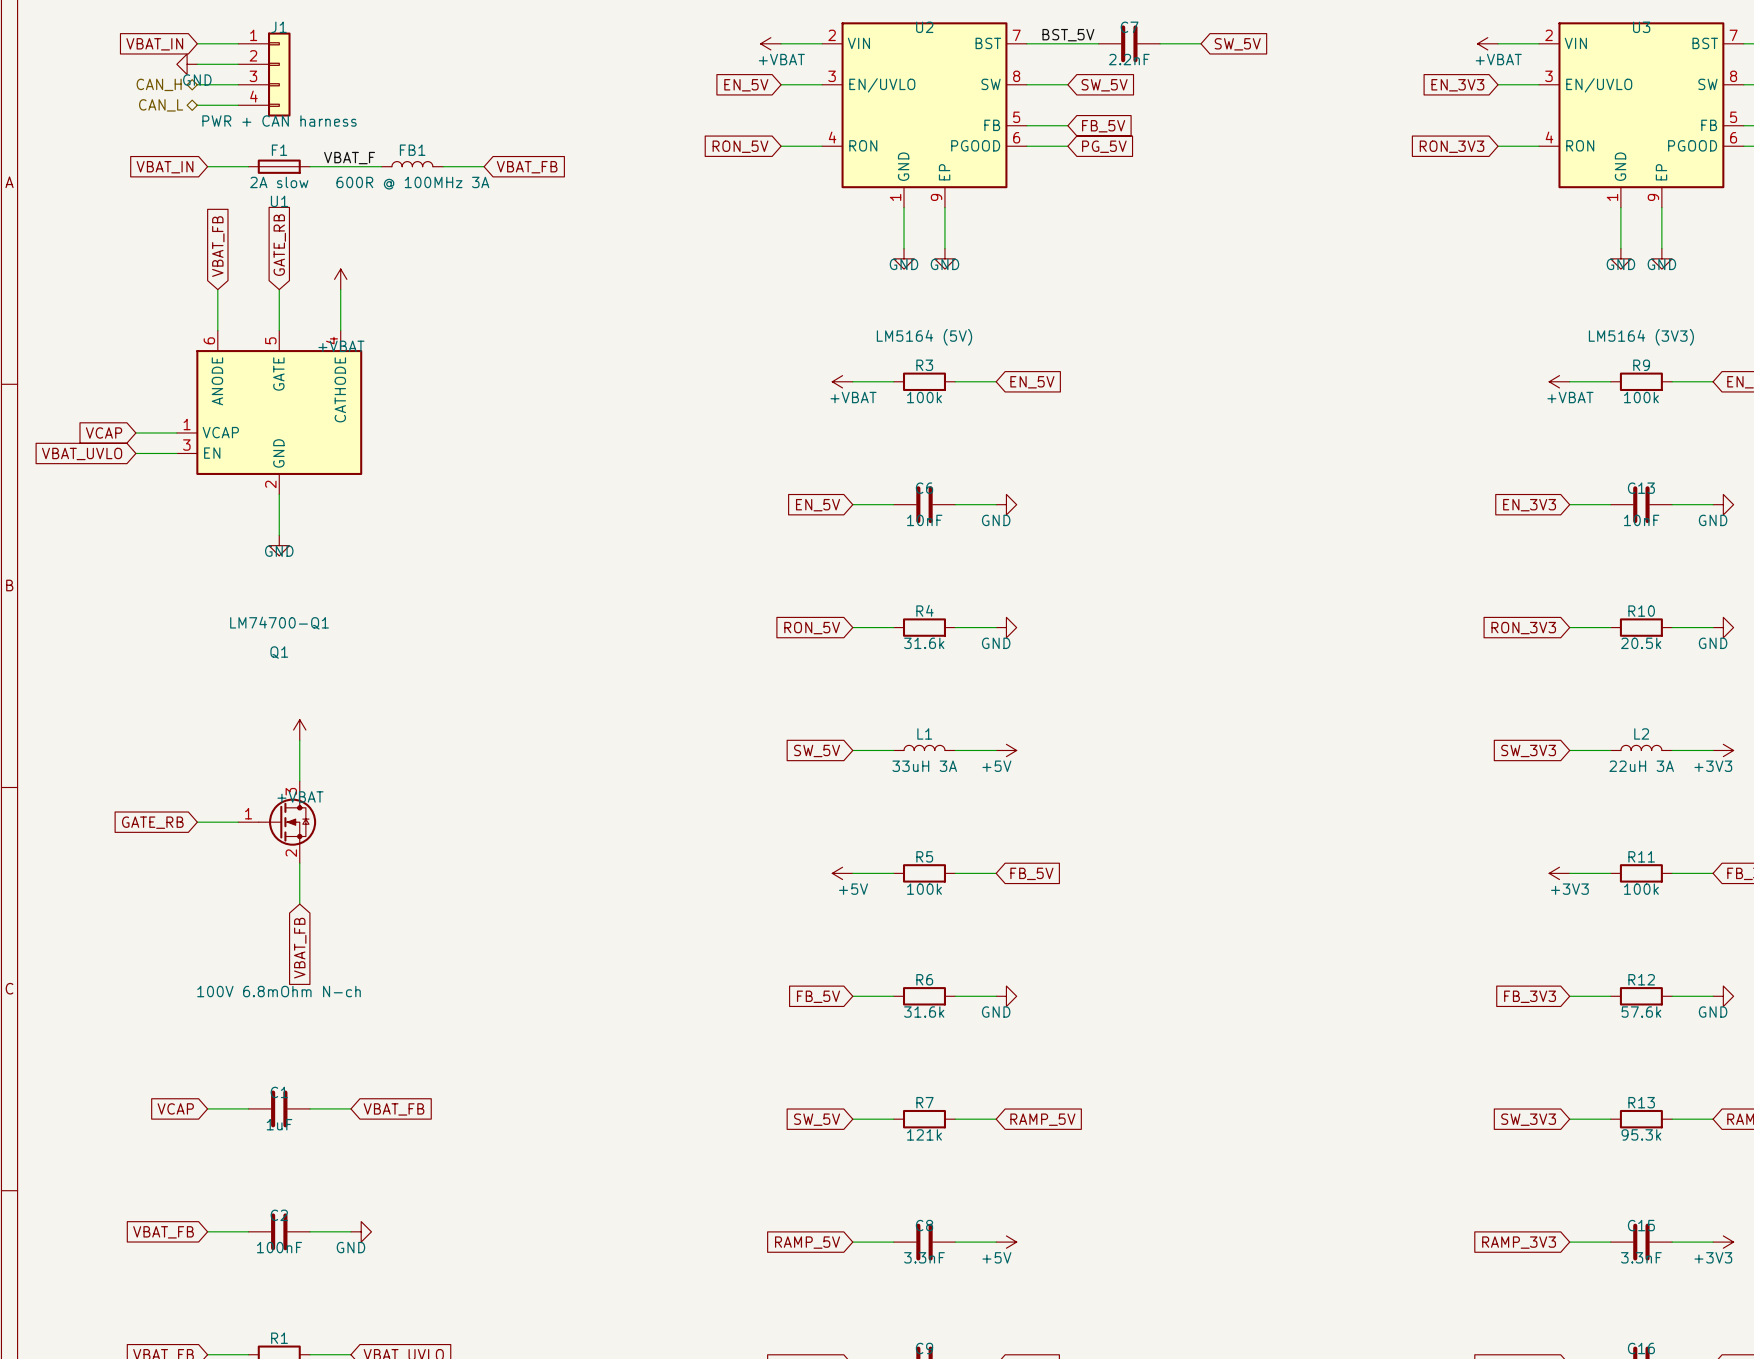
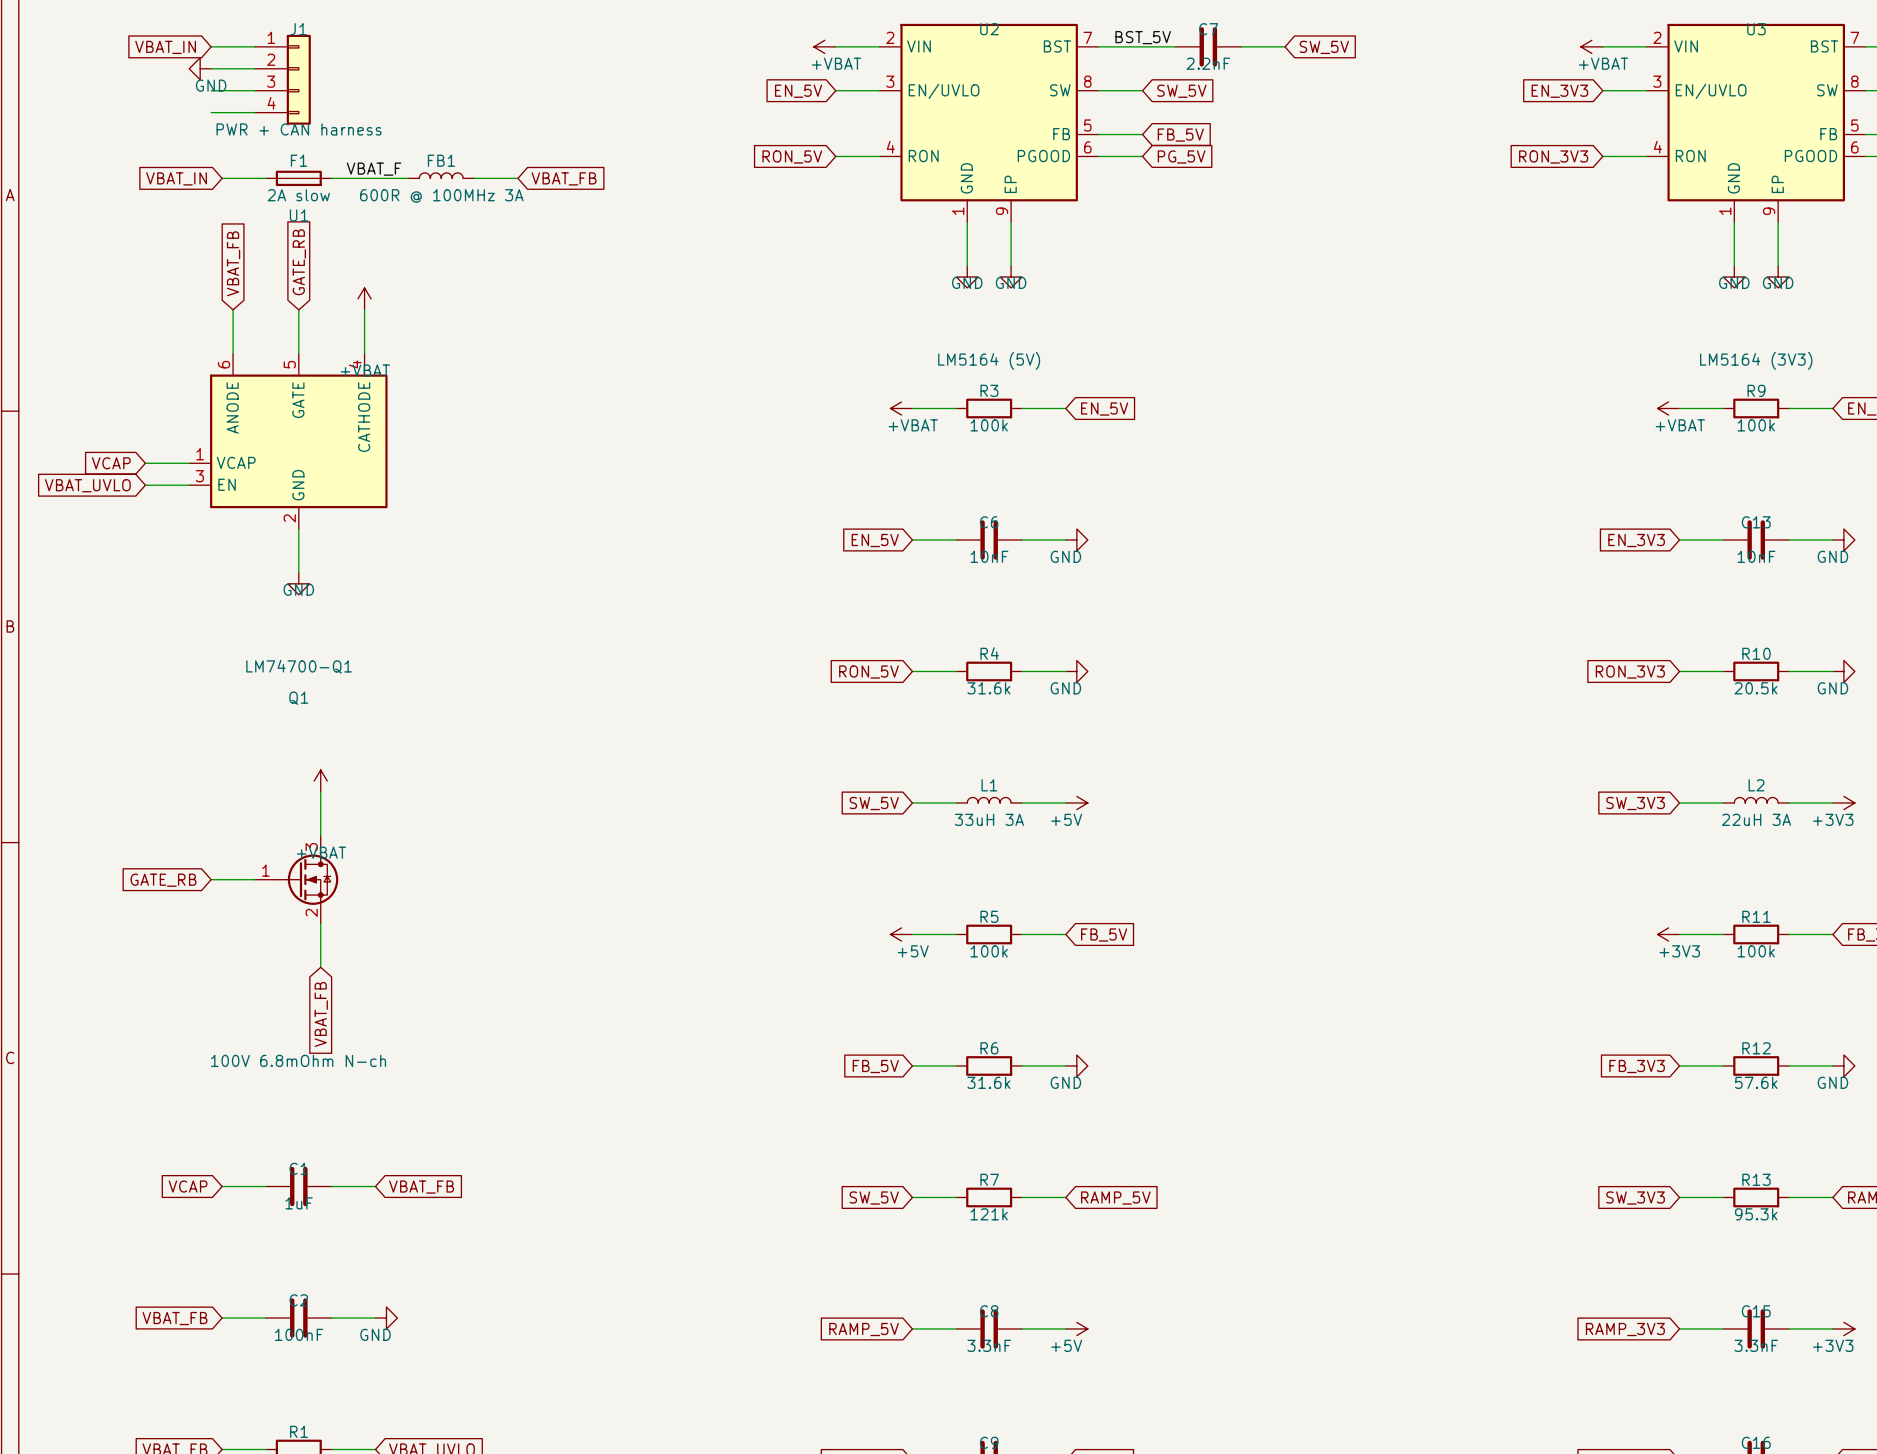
hierarchical label: CAN_H (159, 84) -> none
hierarchical label: CAN_L (161, 105) -> none

